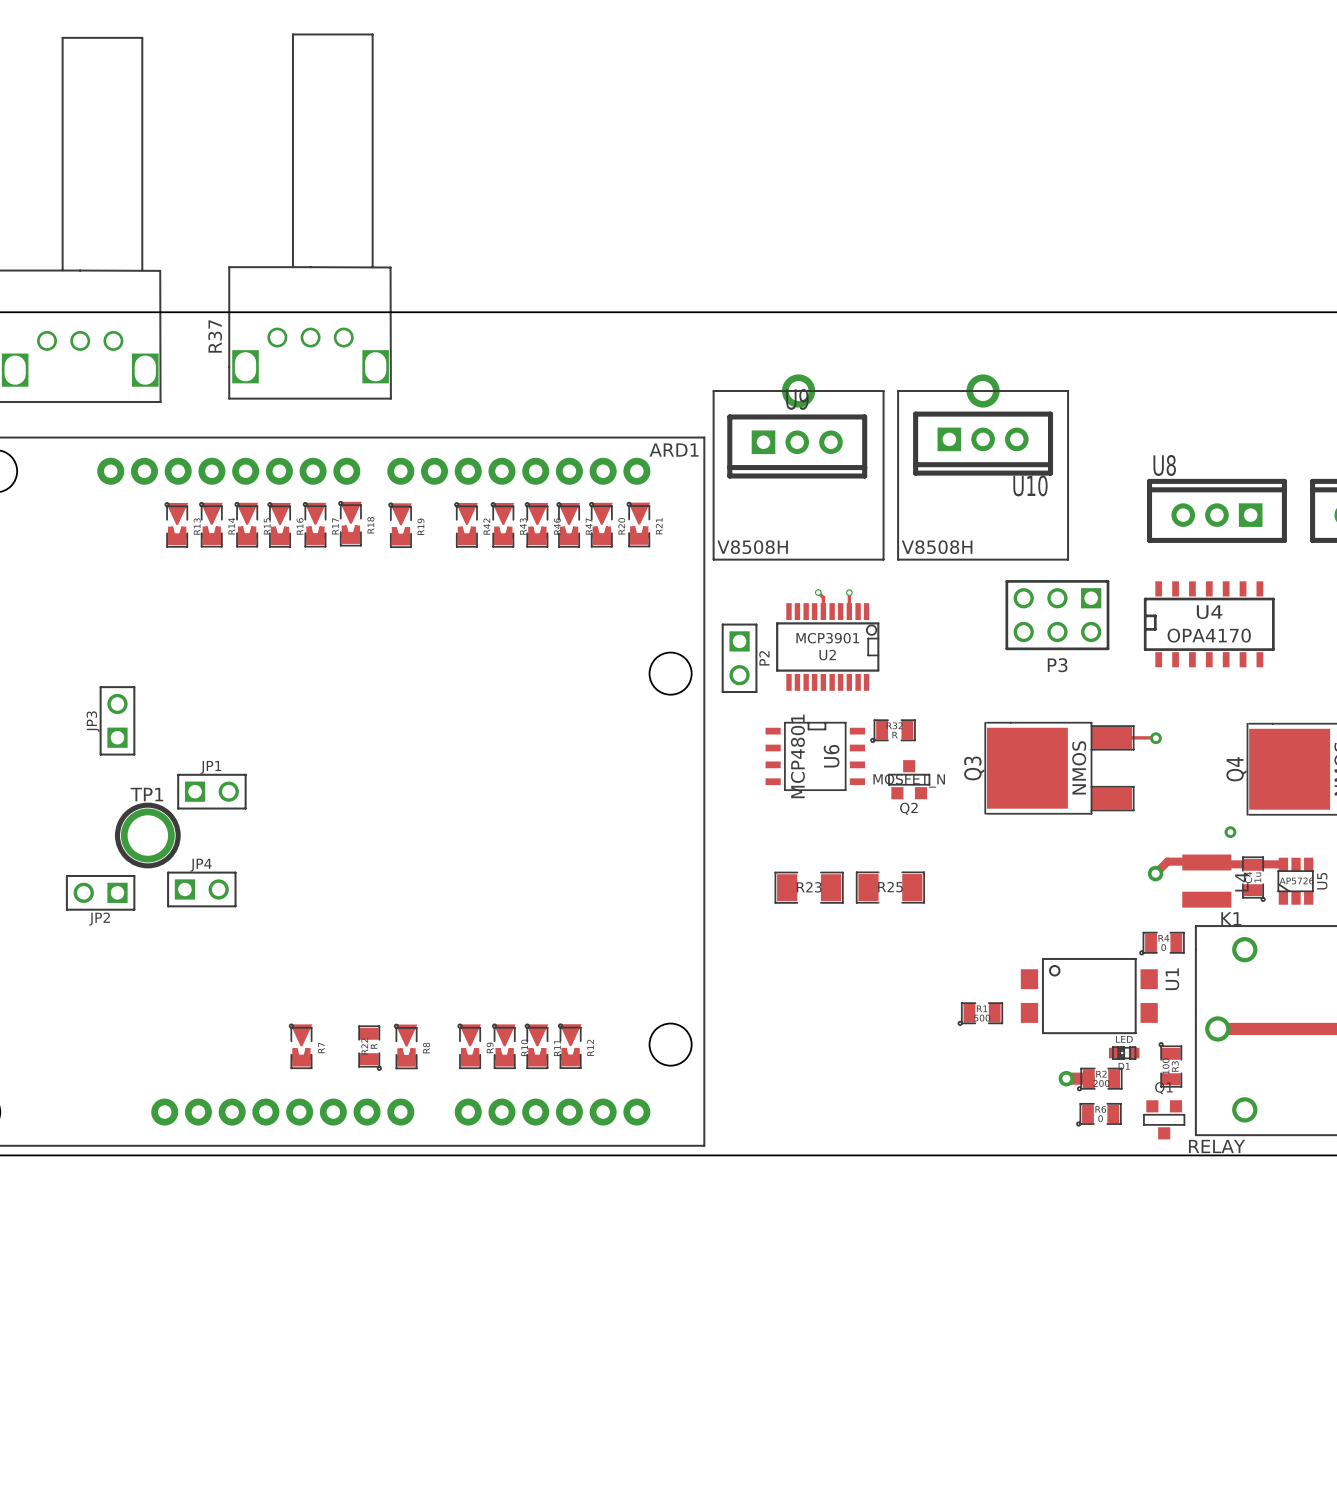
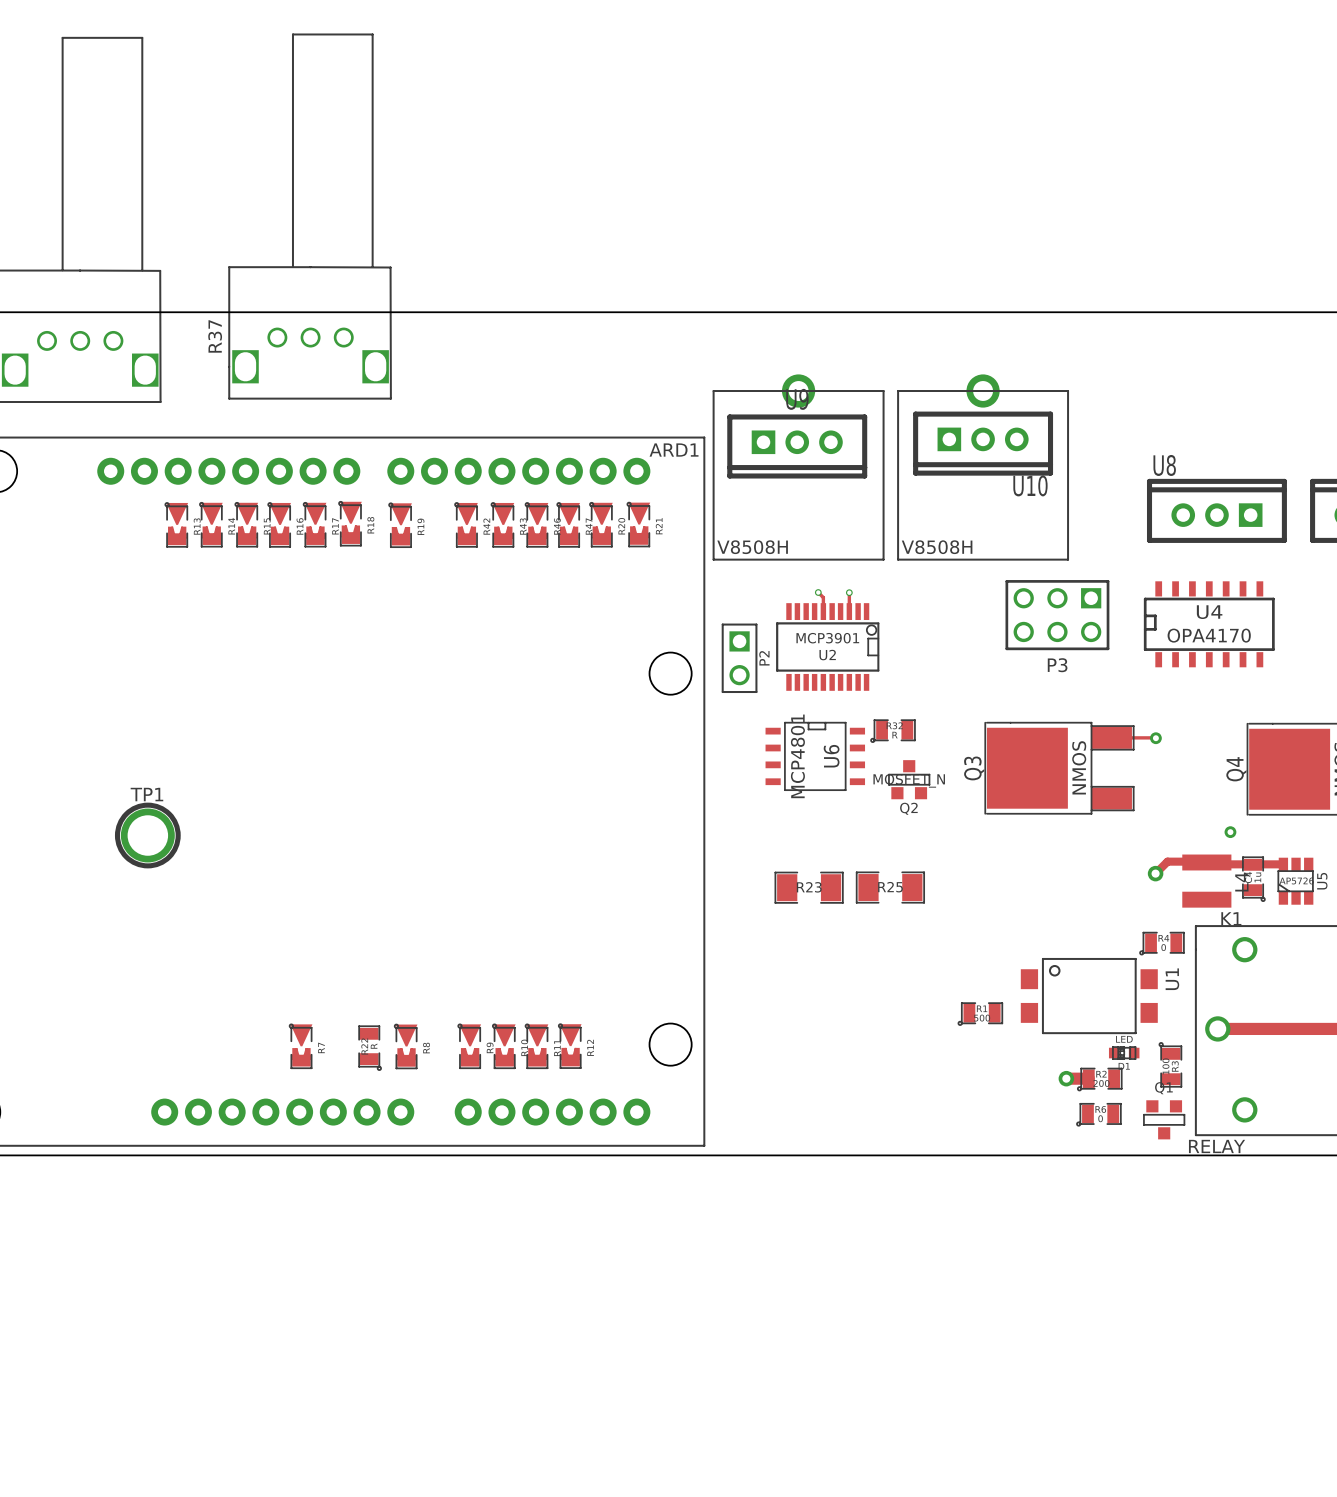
JP3: (117, 720) -> none
JP1: (211, 791) -> none
JP4: (201, 889) -> none
JP2: (100, 892) -> none

